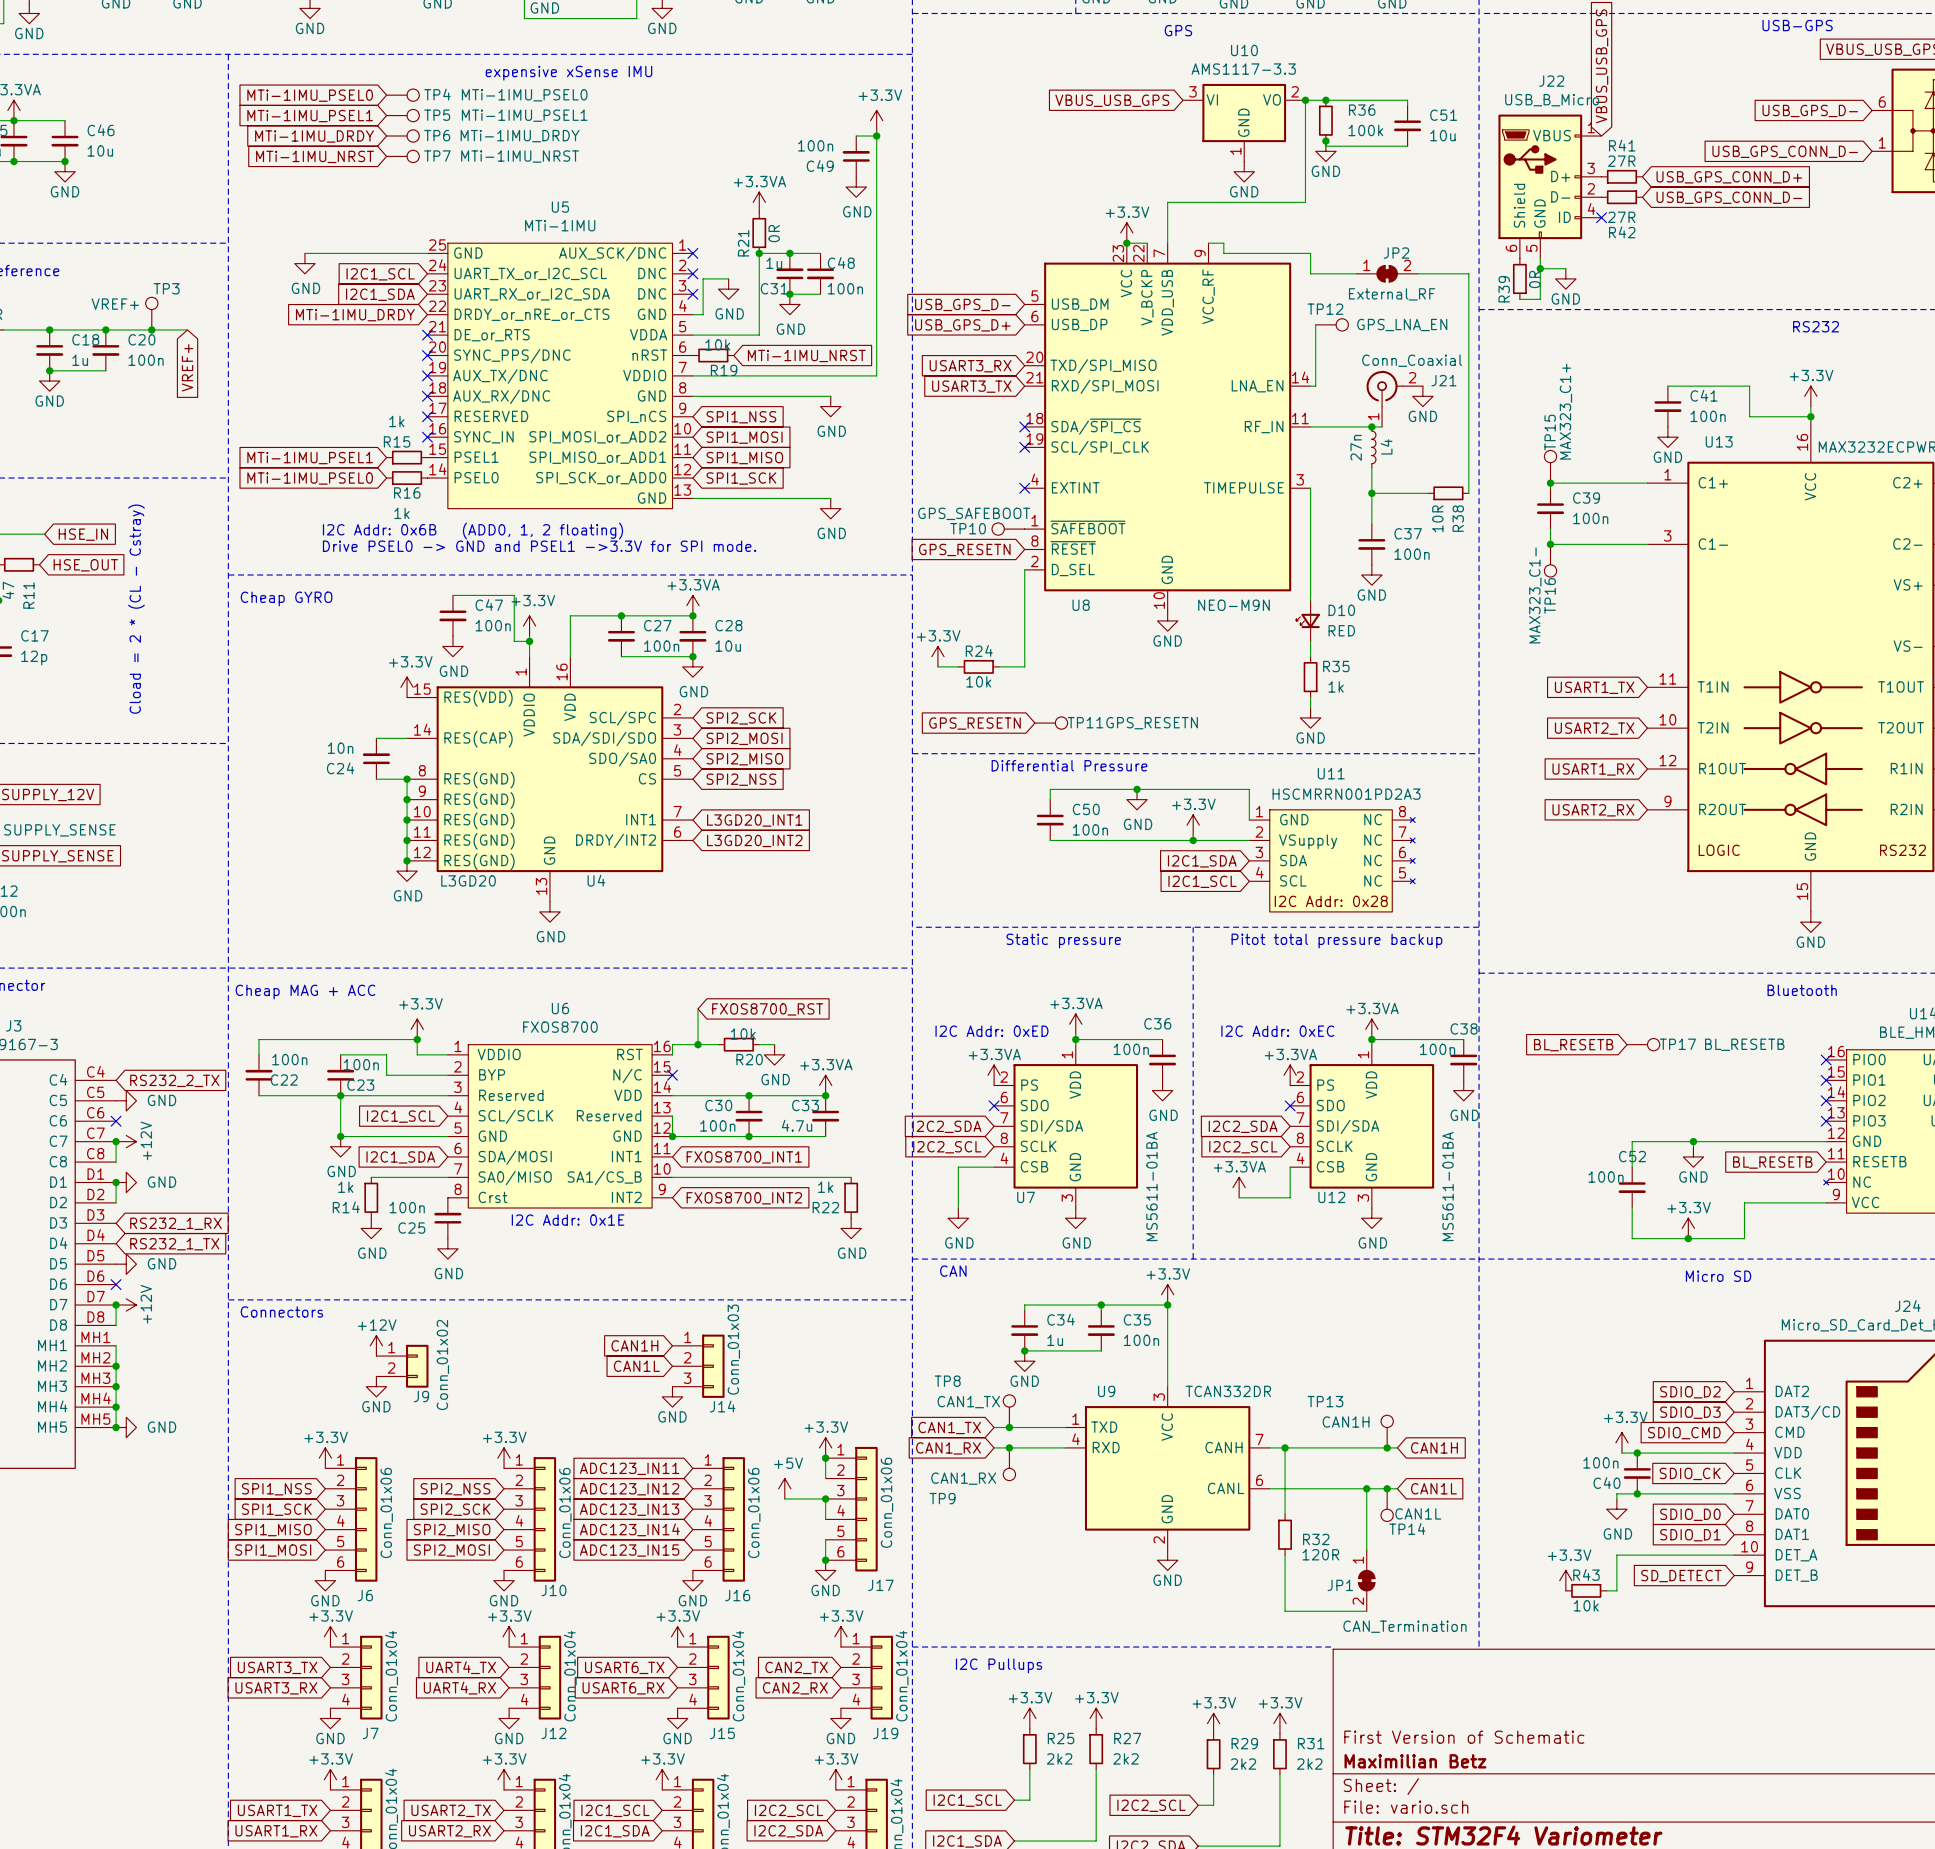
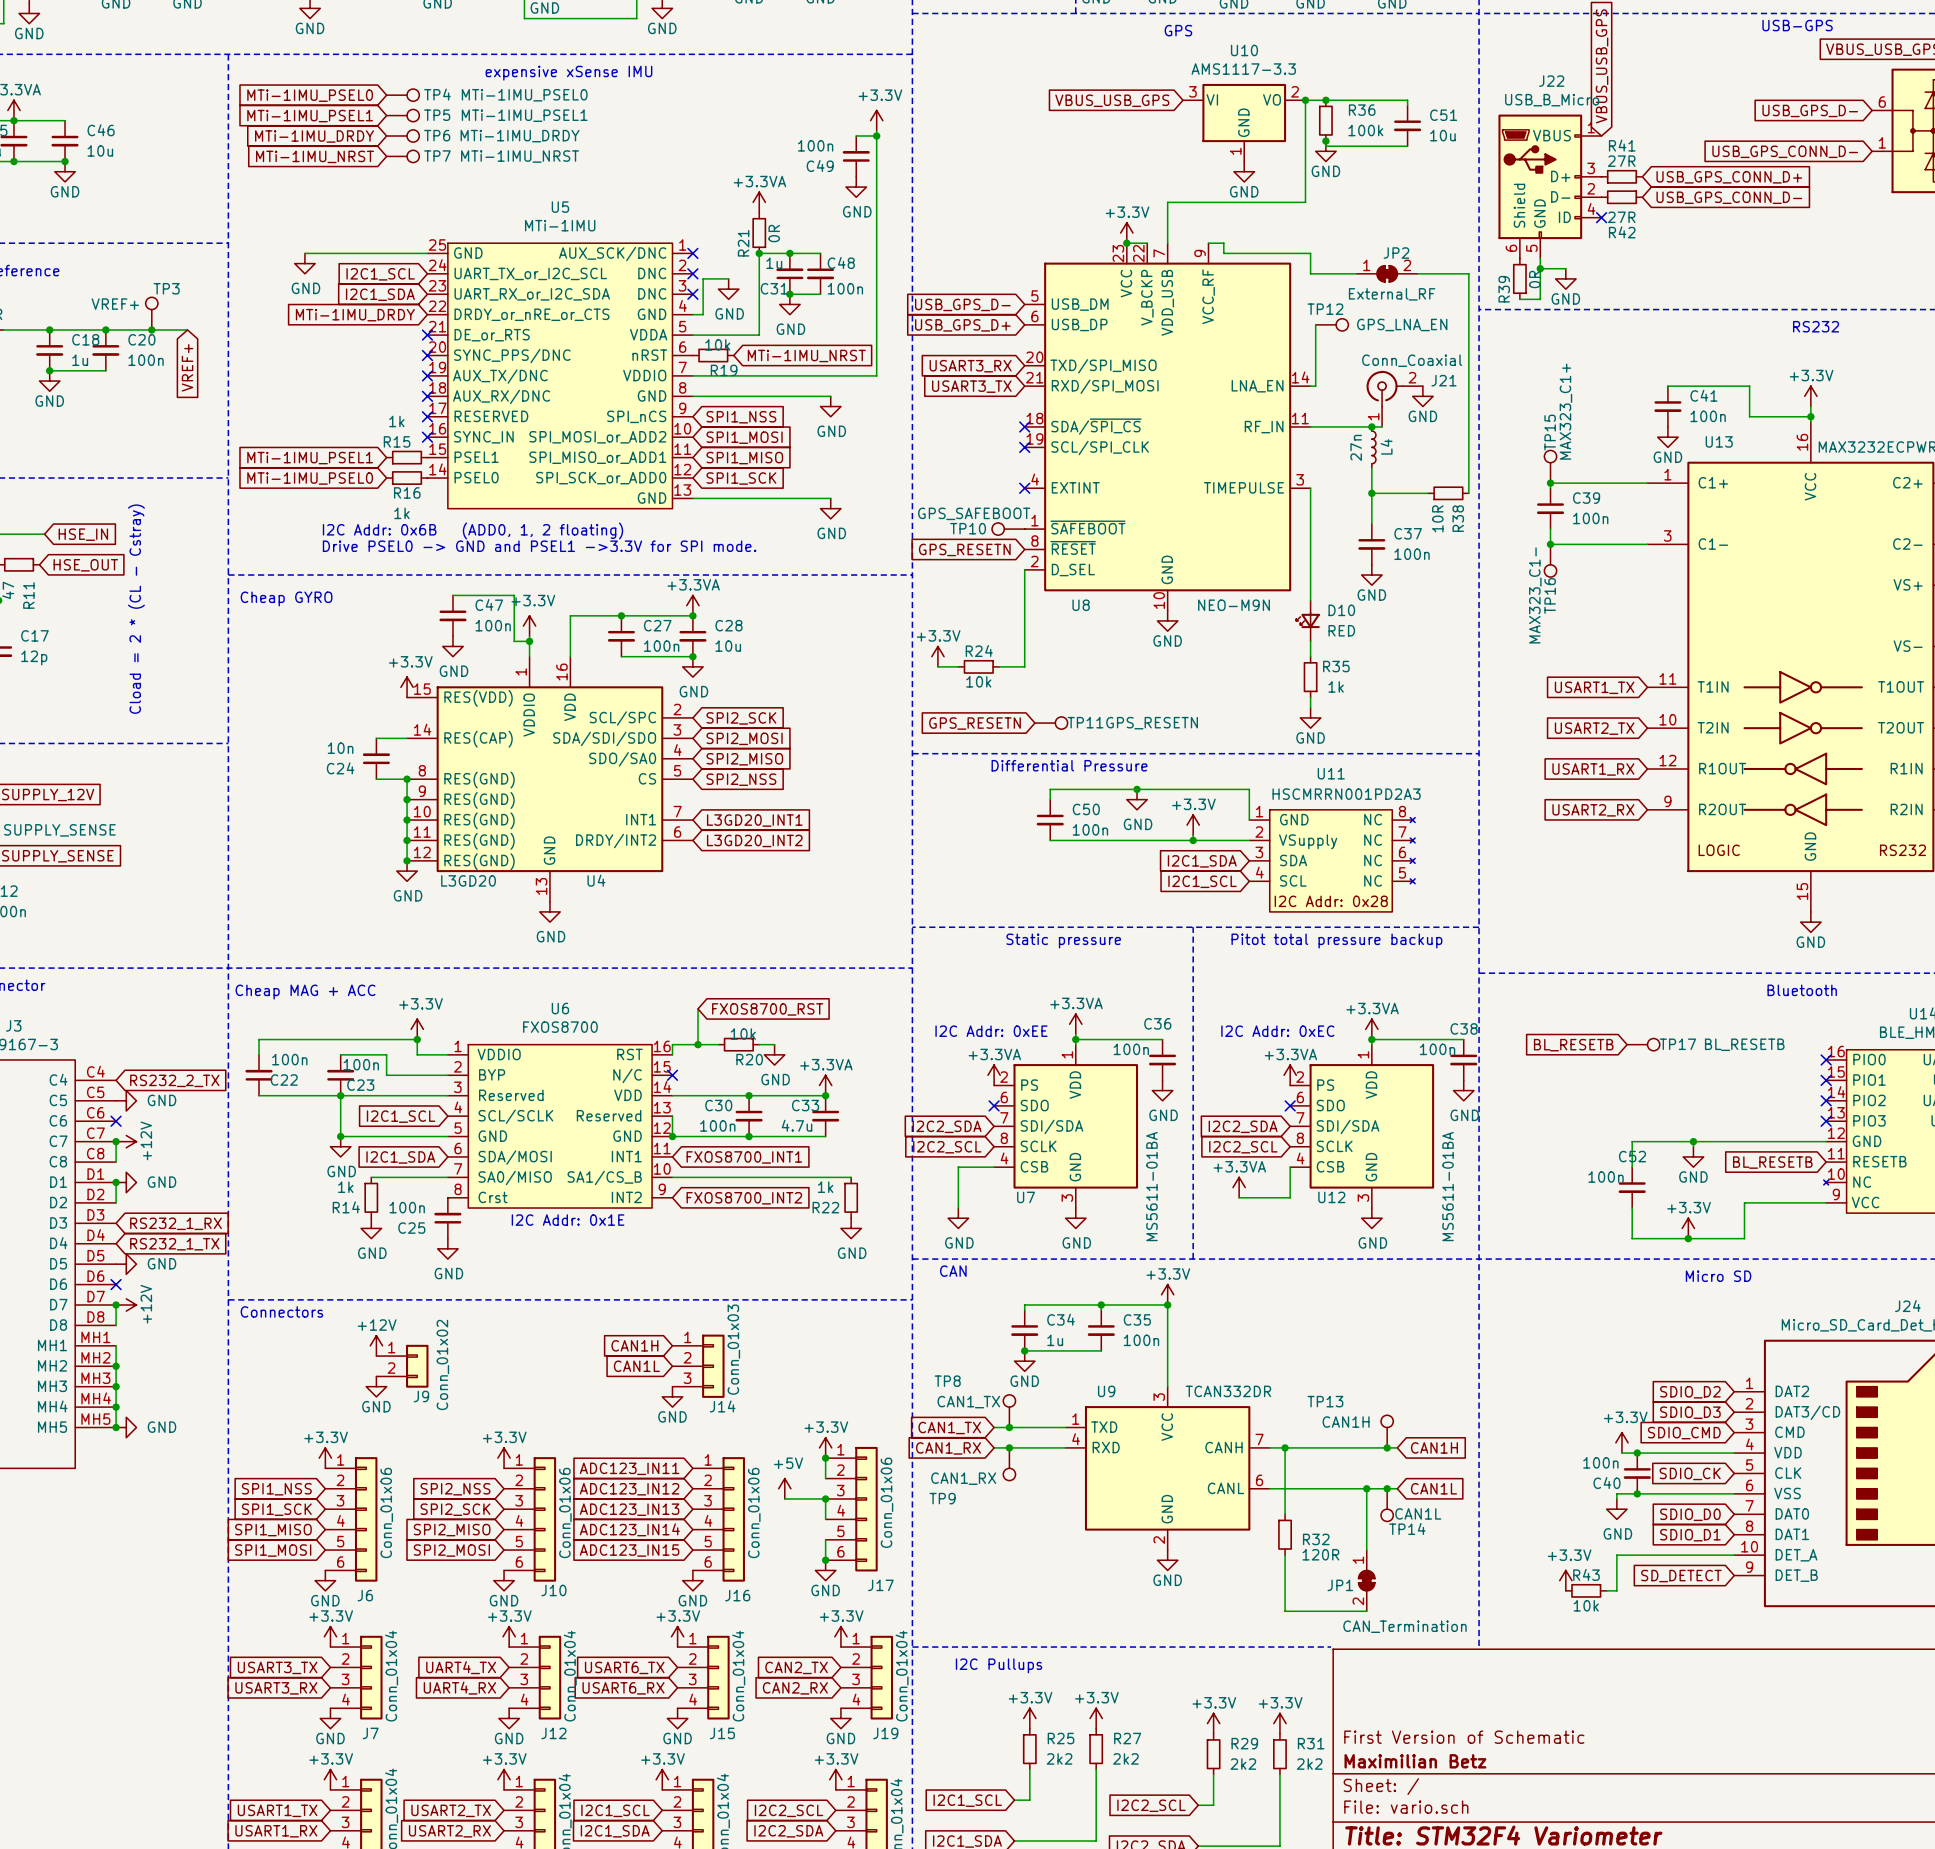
text: I2C Addr: 0xED (991, 1031) -> I2C Addr: 0xEE (991, 1031)

